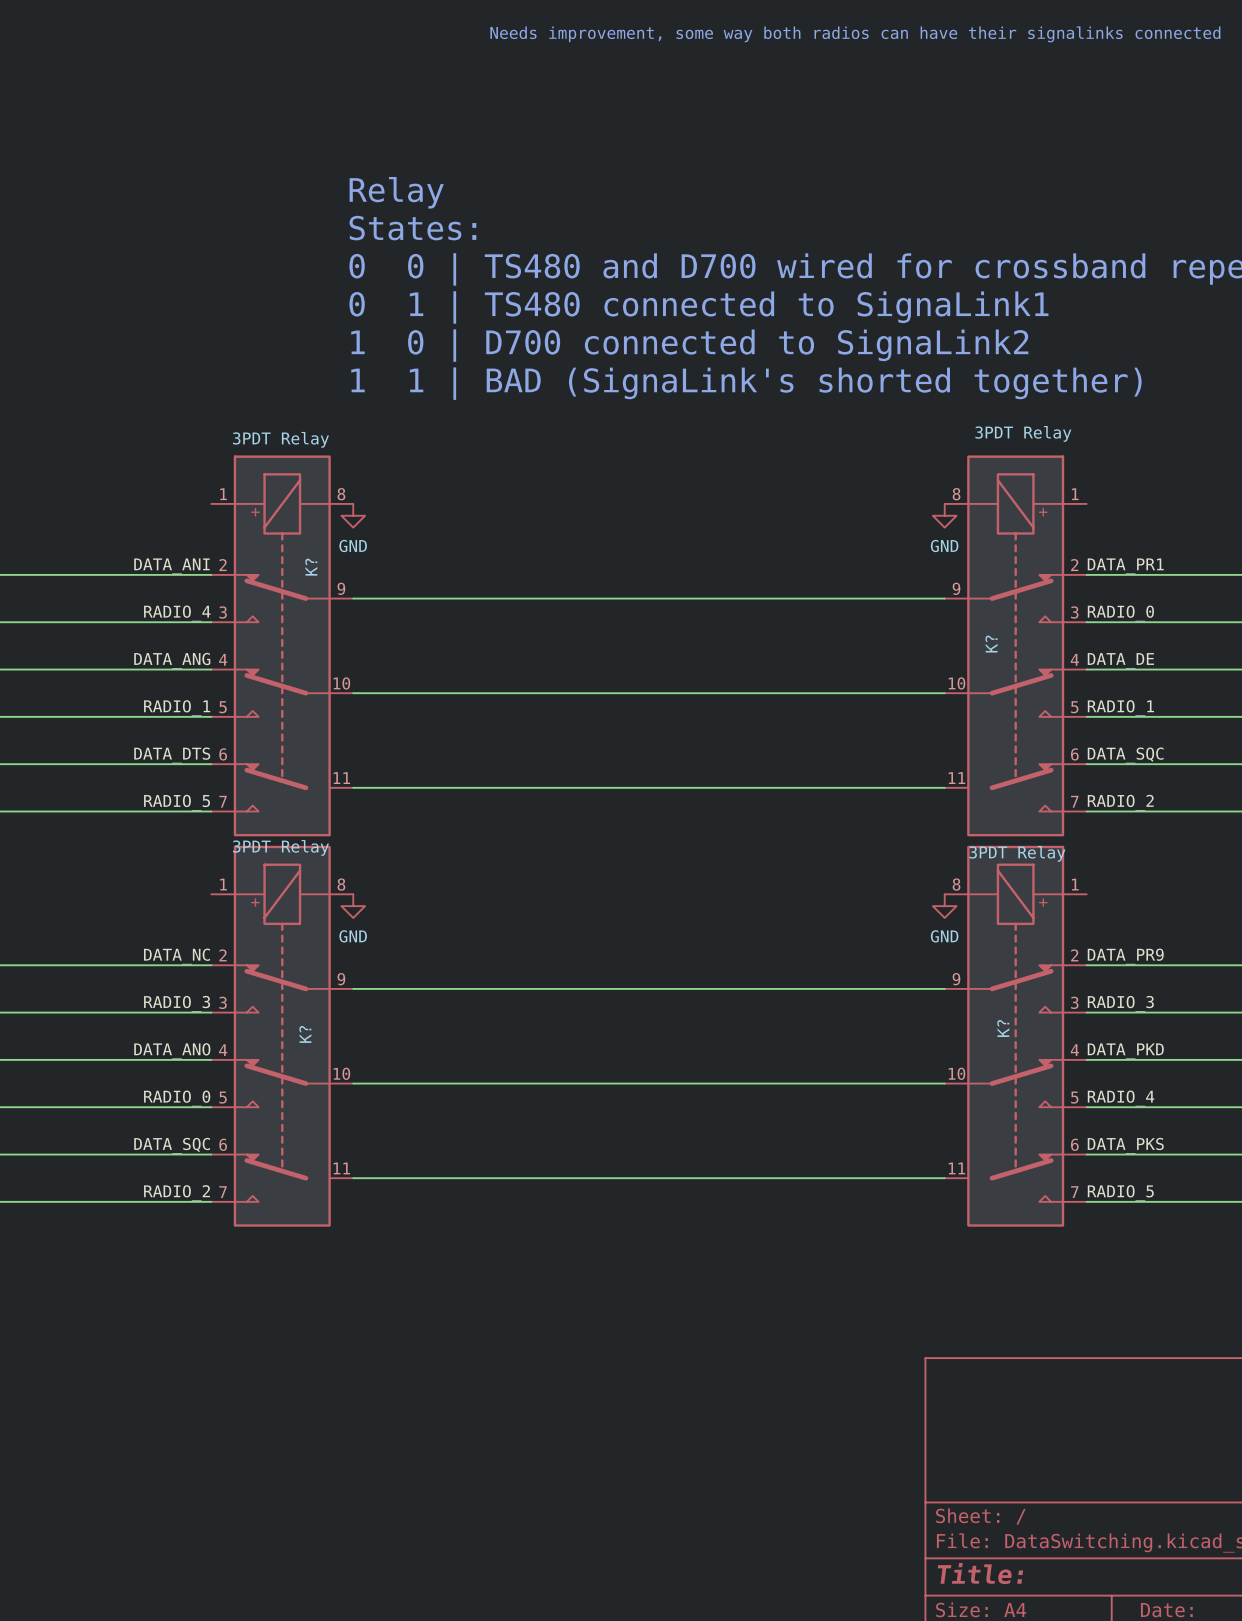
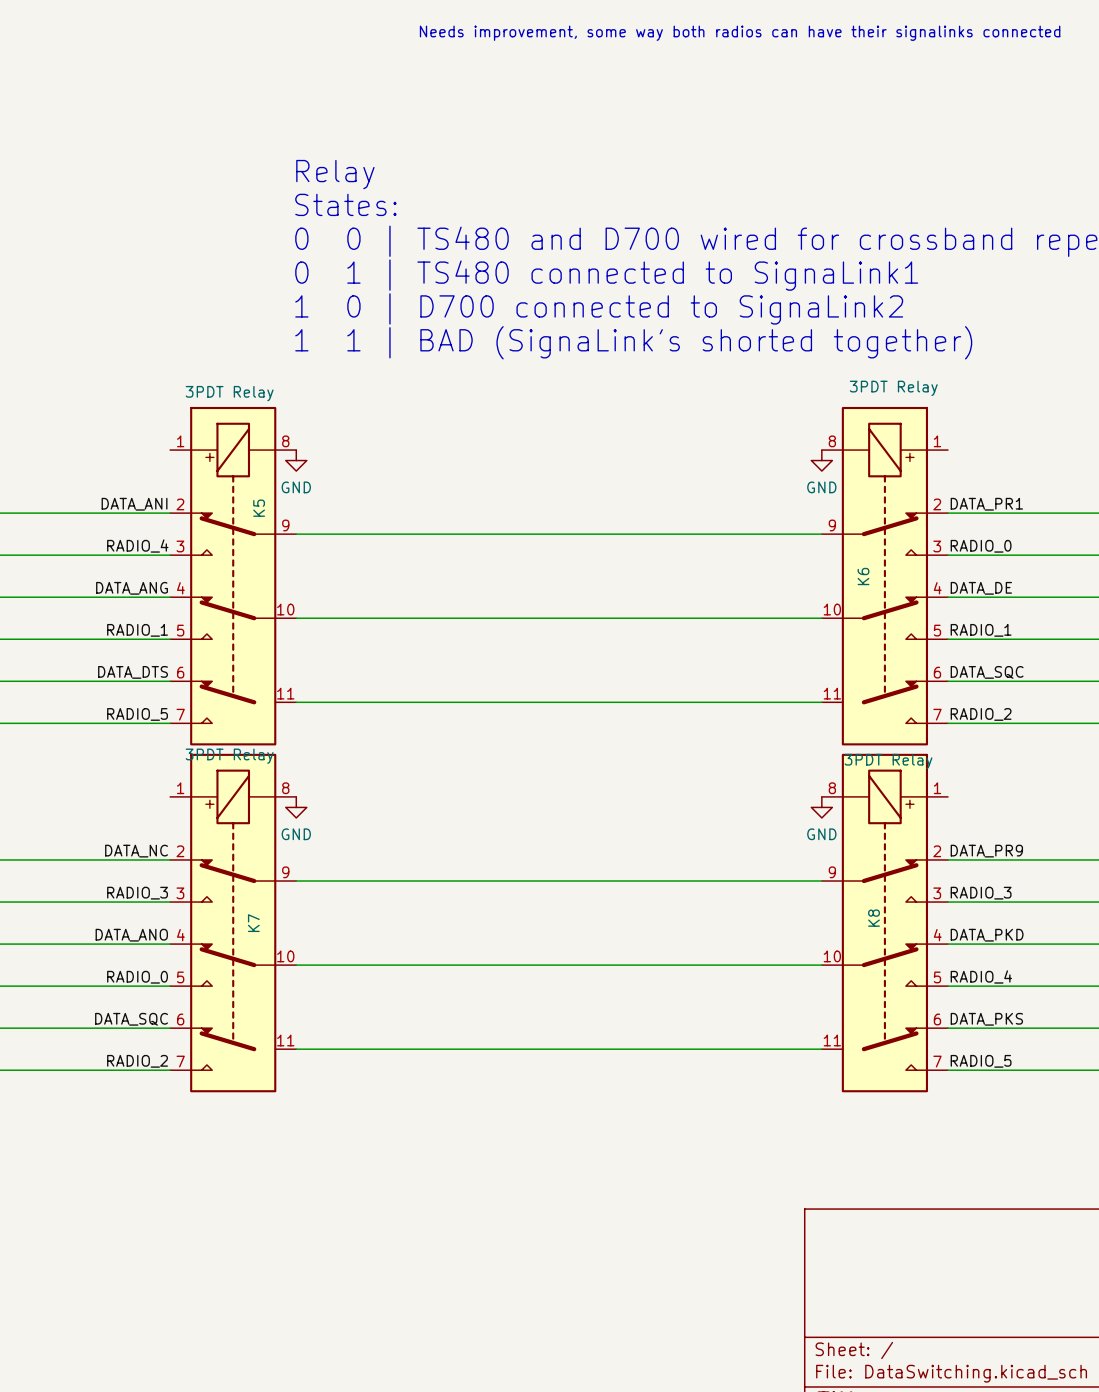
K? name: K? (311, 567) -> K5 (259, 508)
K? name: K? (991, 644) -> K6 (863, 576)
K? name: K? (1003, 1028) -> K8 (874, 918)
K? name: K? (305, 1034) -> K7 (253, 923)

